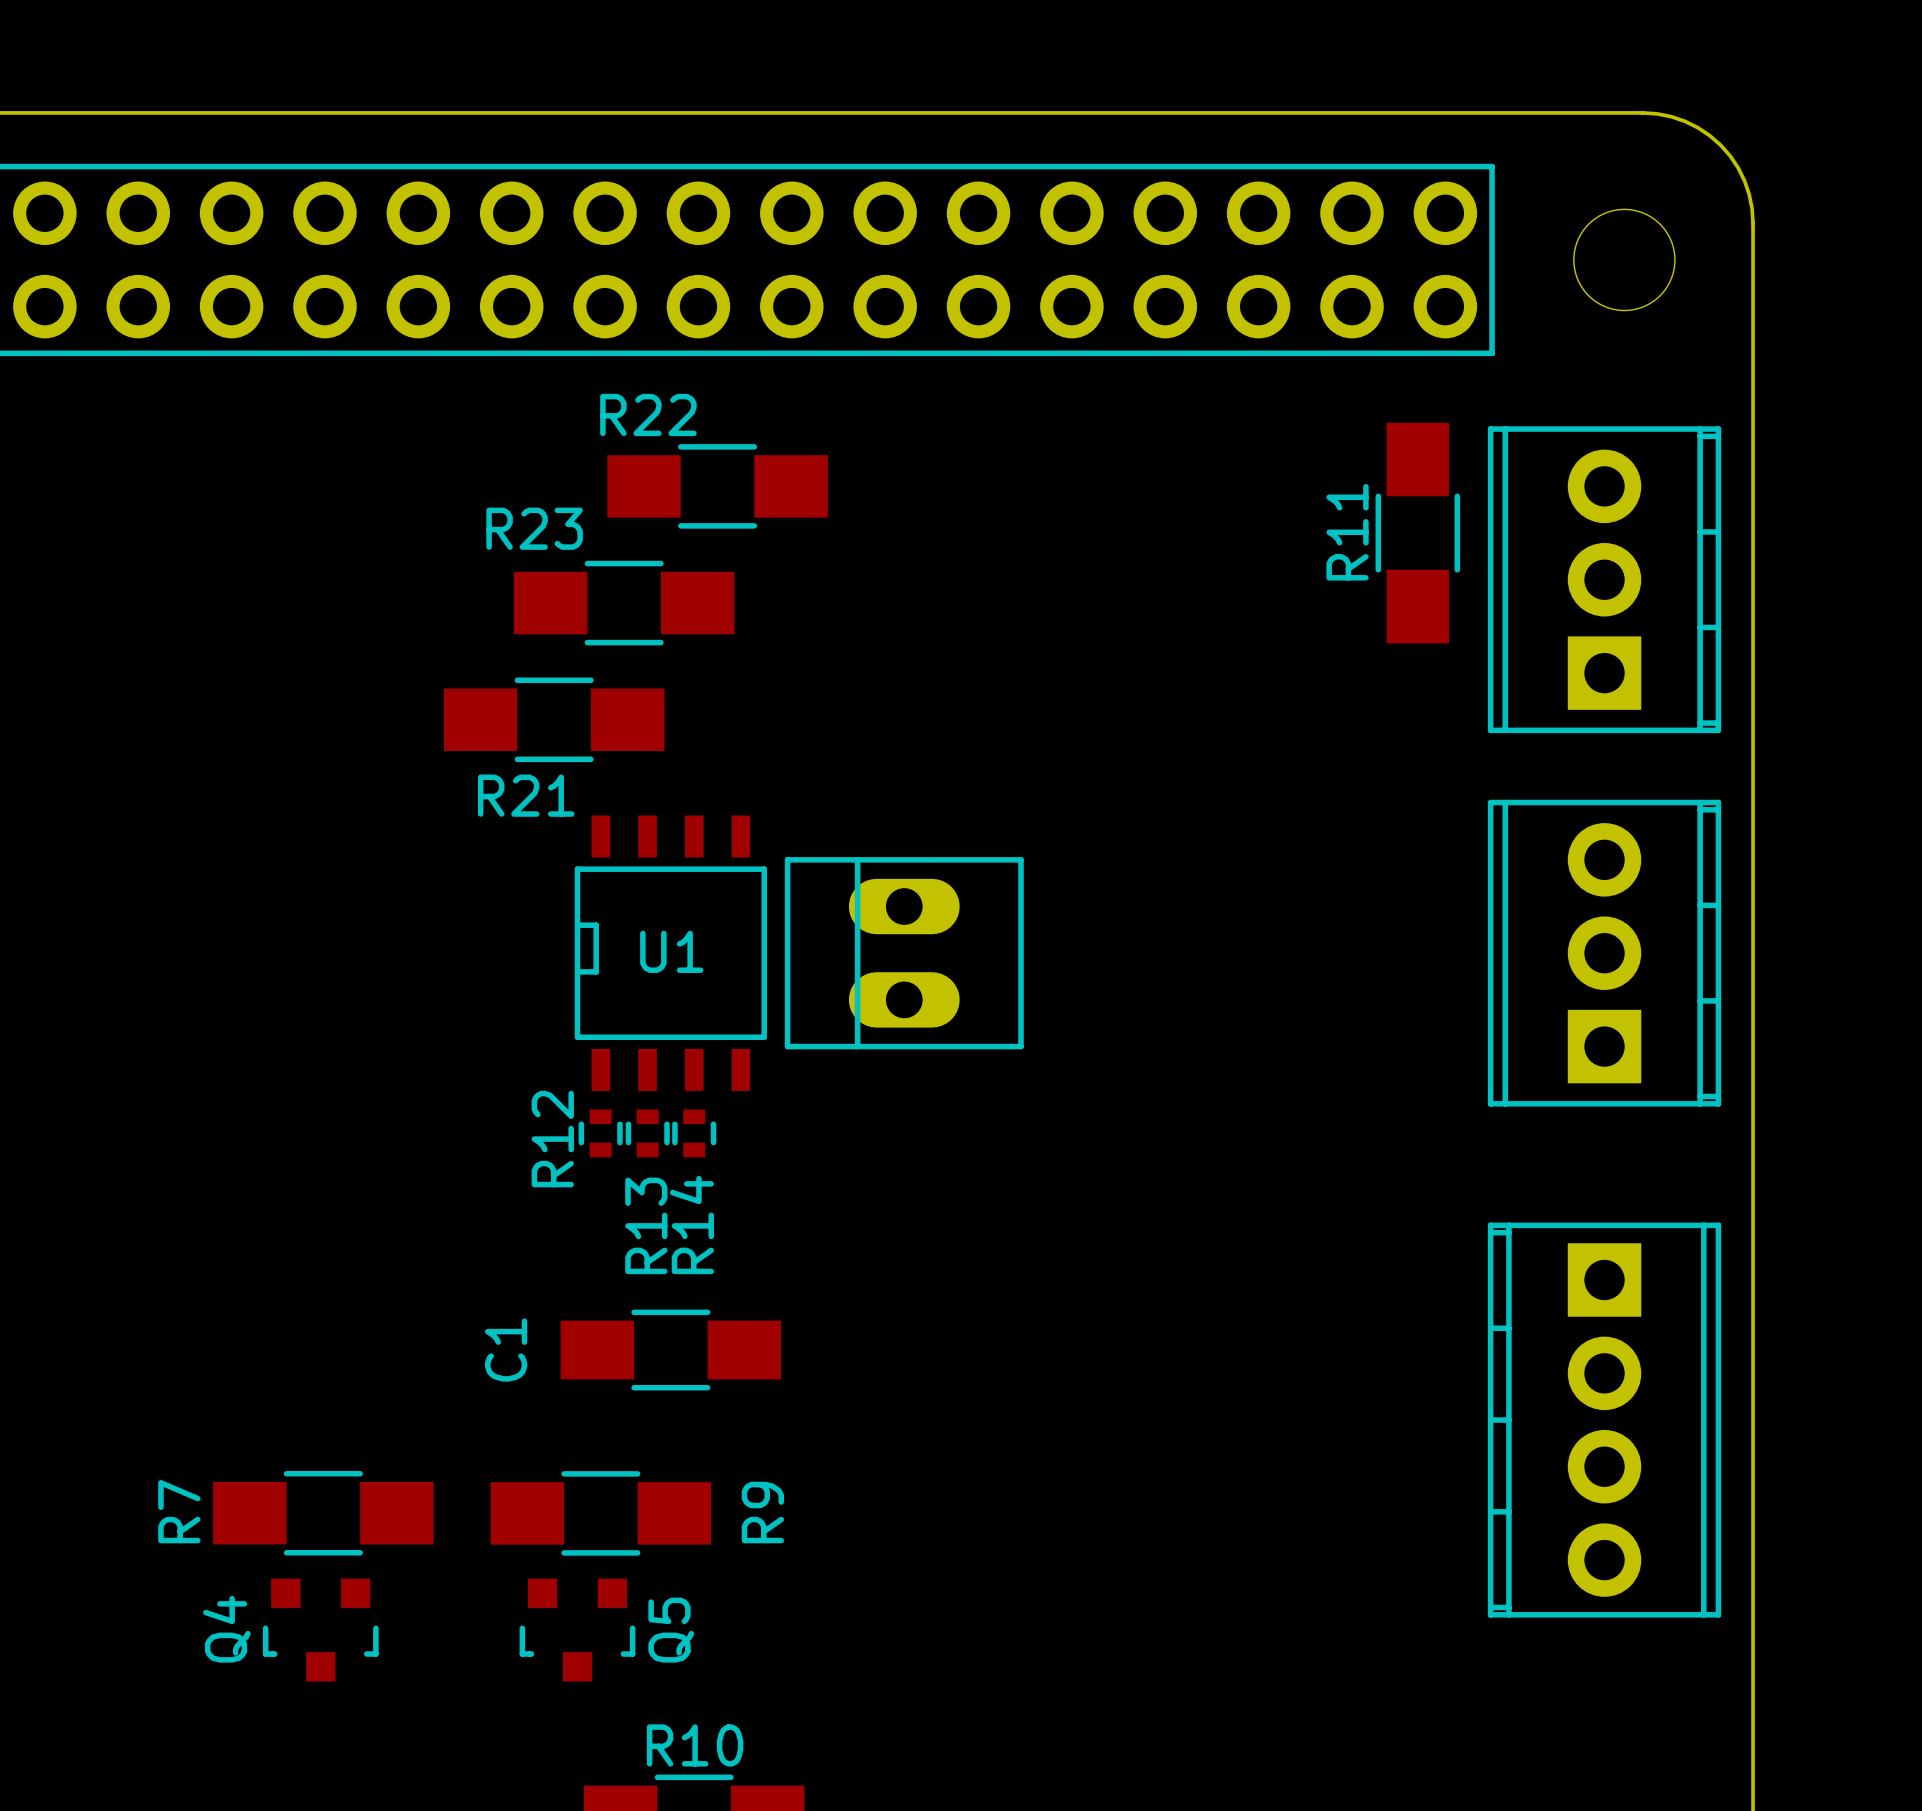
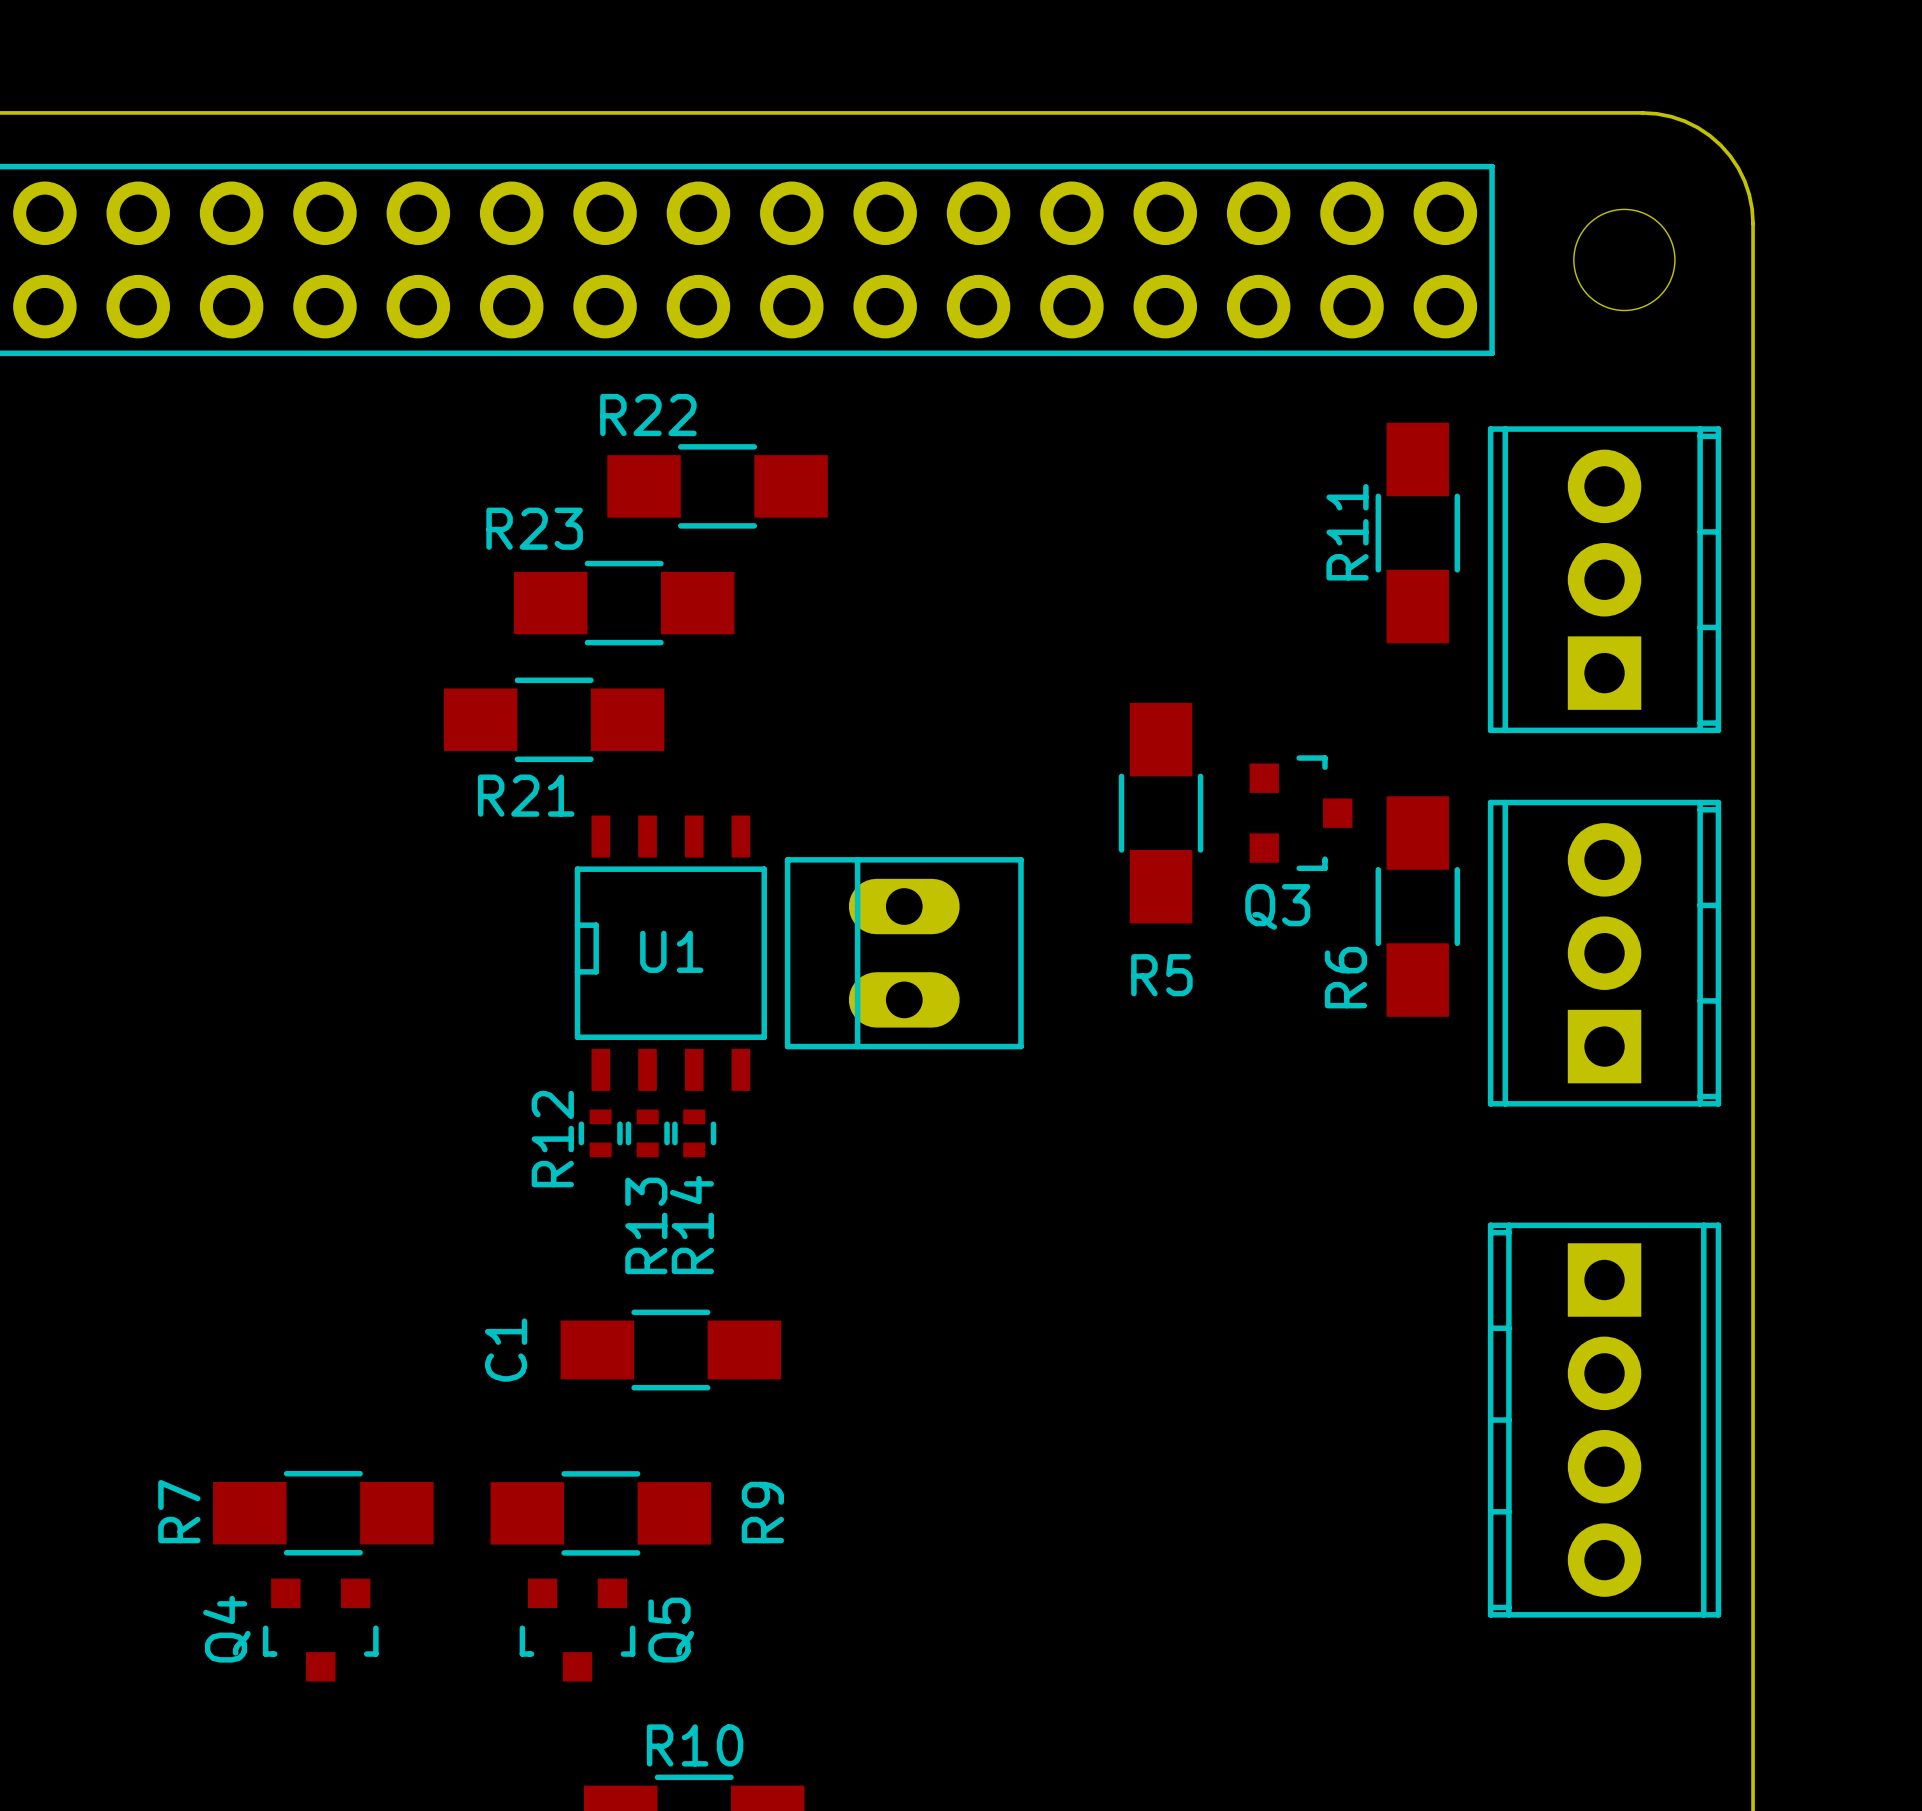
R5: none -> (1161, 813)
Q3: none -> (1301, 813)
R6: none -> (1417, 906)

